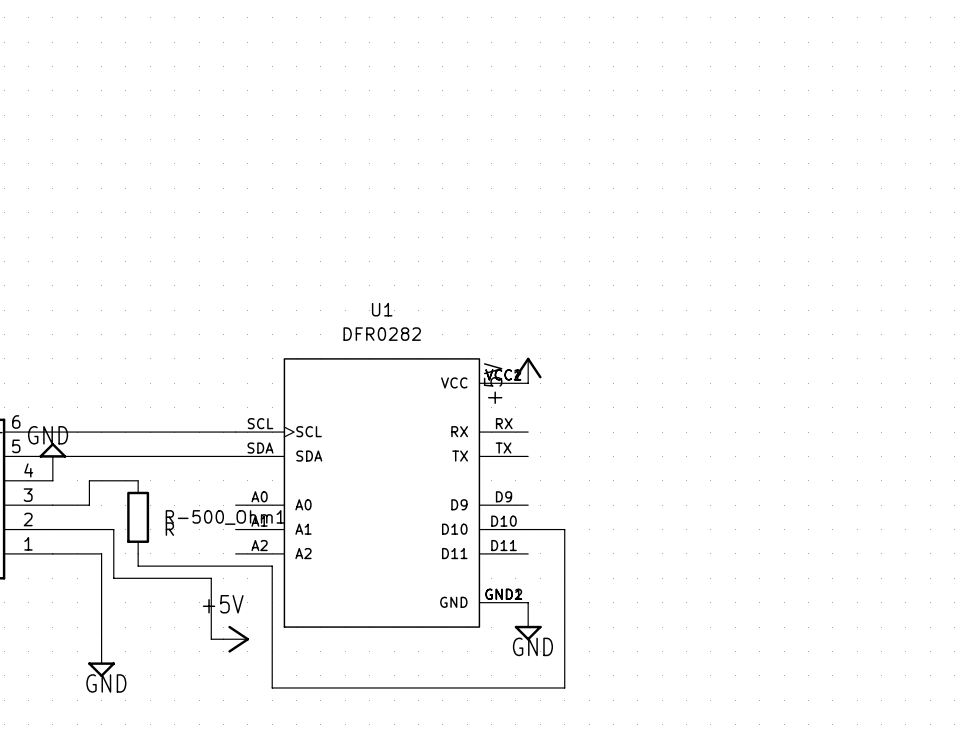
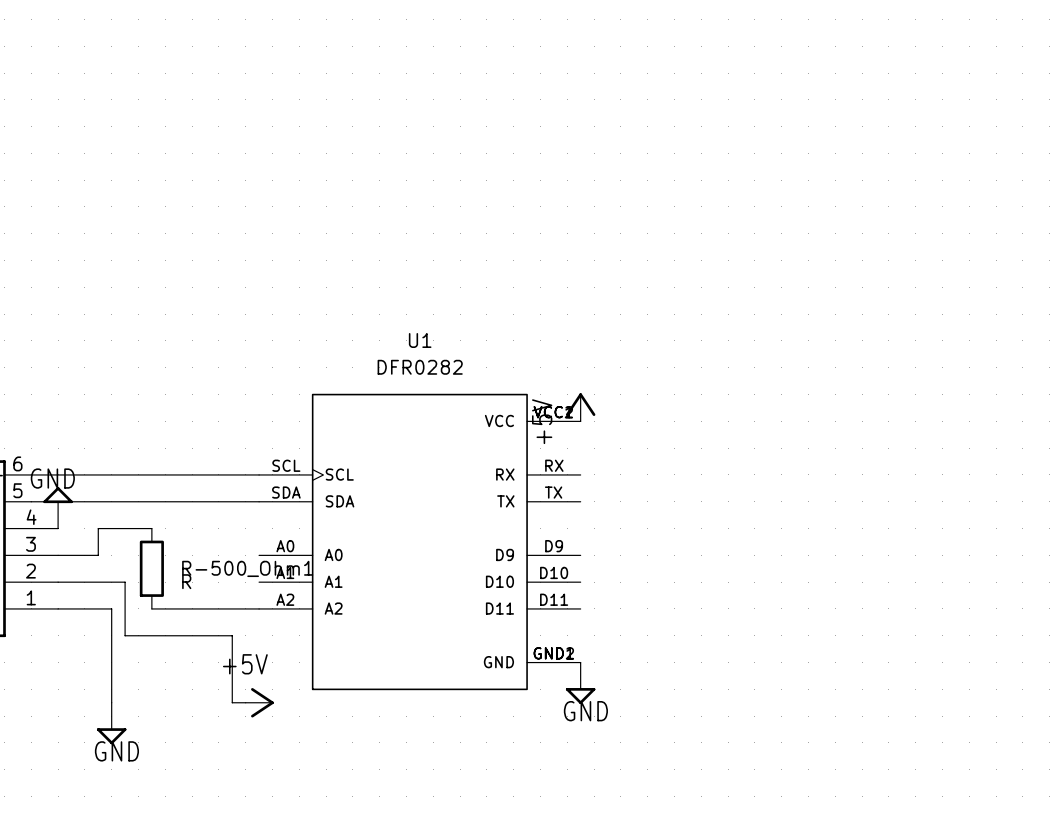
wire: (528, 529) (564, 529) (564, 687) (272, 687) (272, 566) (138, 566) (138, 553) -> (259, 608) (151, 608)

